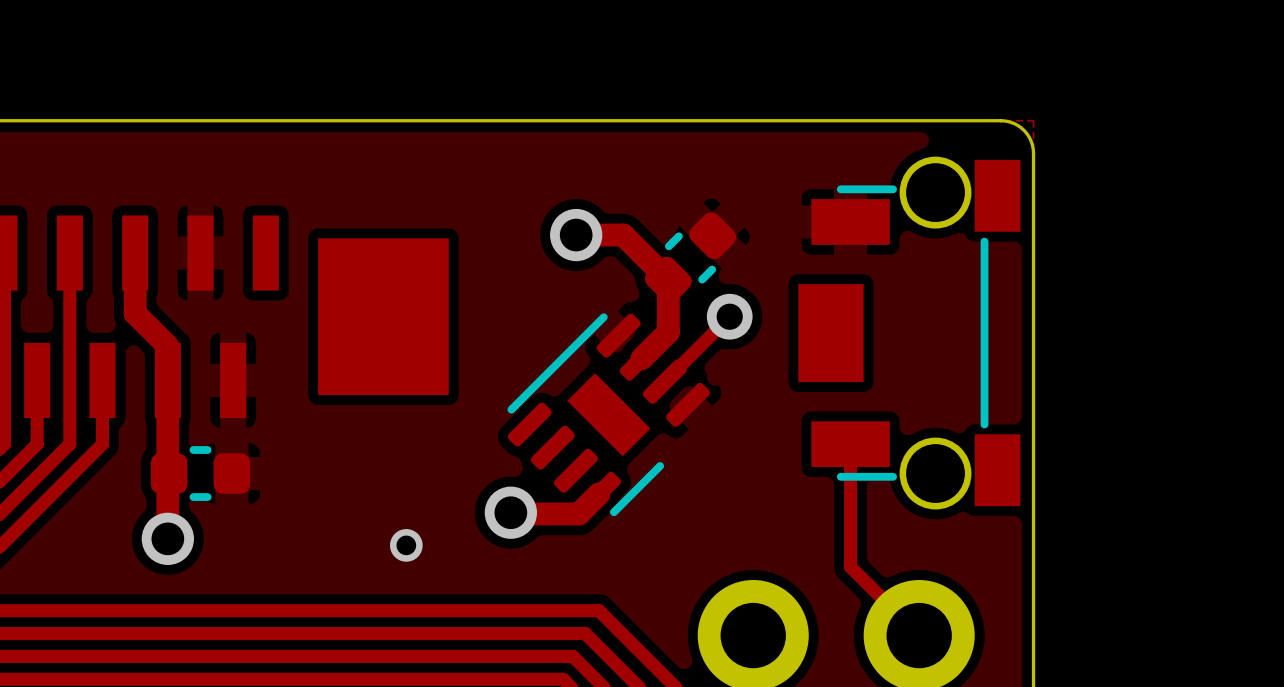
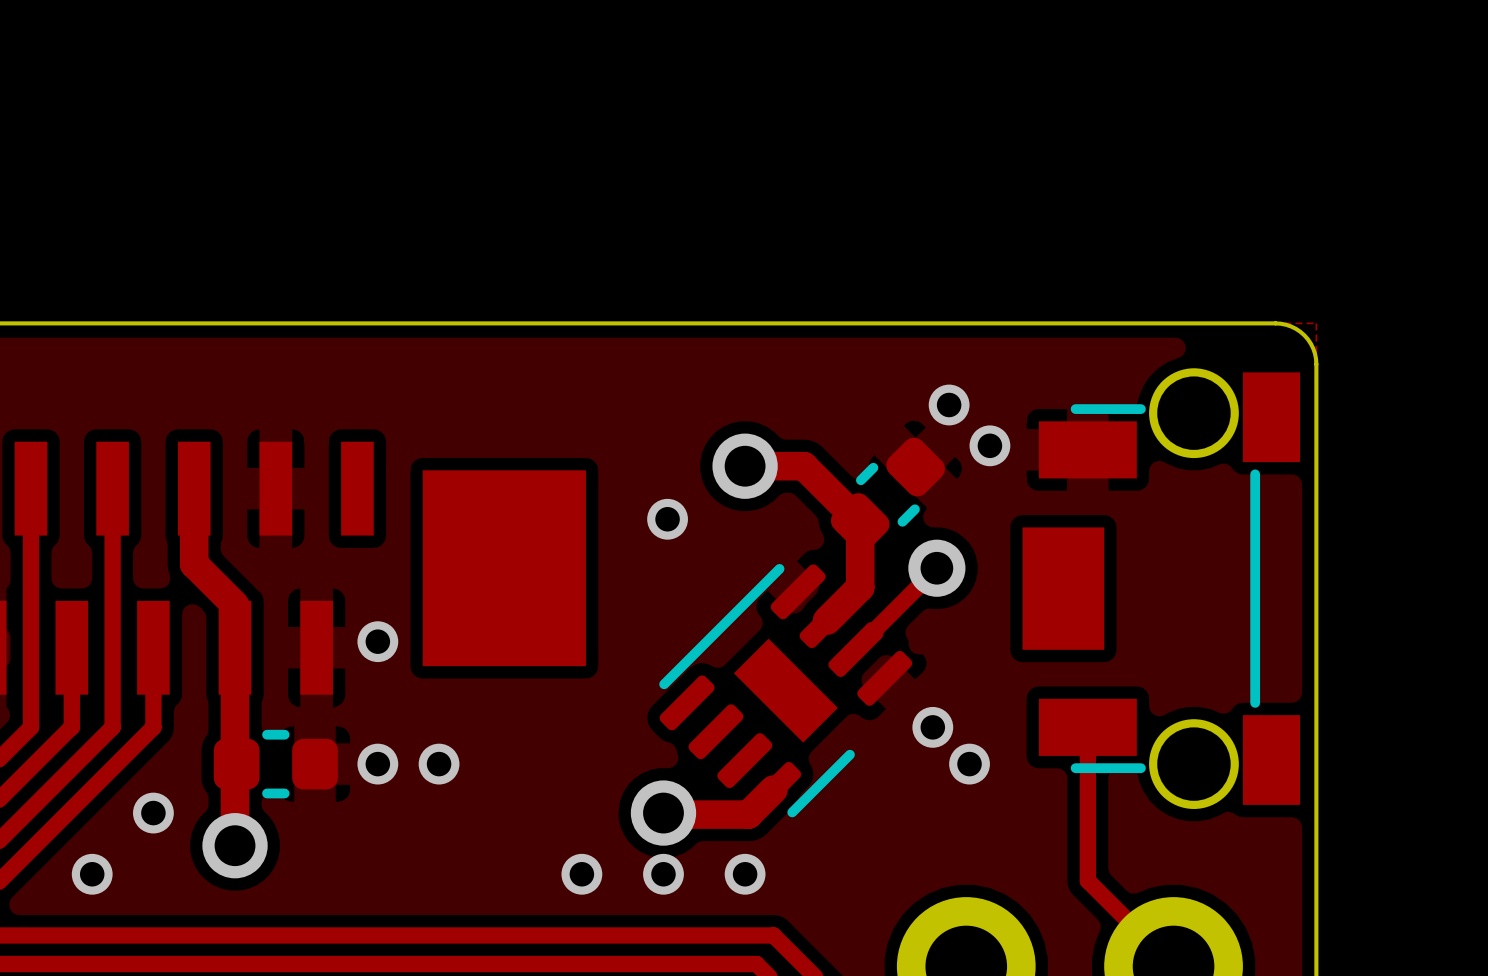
via: none -> (949, 405)
via: none -> (989, 445)
via: none -> (667, 519)
via: none -> (377, 641)
via: none -> (932, 727)
via: none -> (377, 764)
via: none -> (439, 764)
via: none -> (969, 764)
via: none -> (153, 813)
via position: (406, 545) -> (581, 874)
via: none -> (92, 874)
via: none -> (663, 874)
via: none -> (745, 874)

